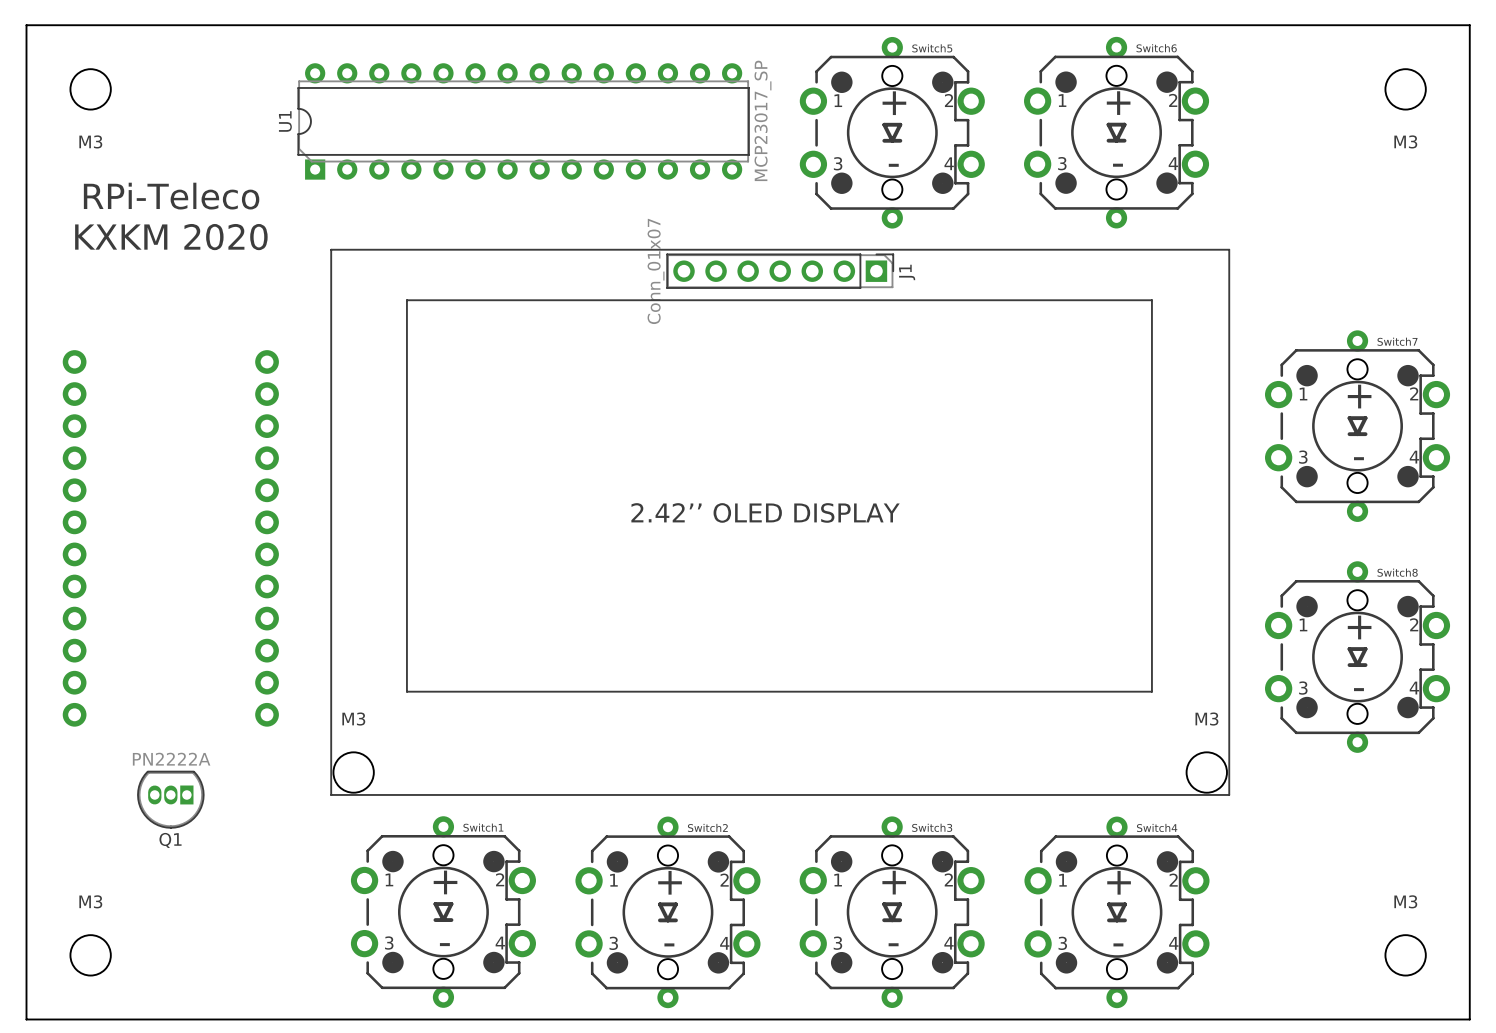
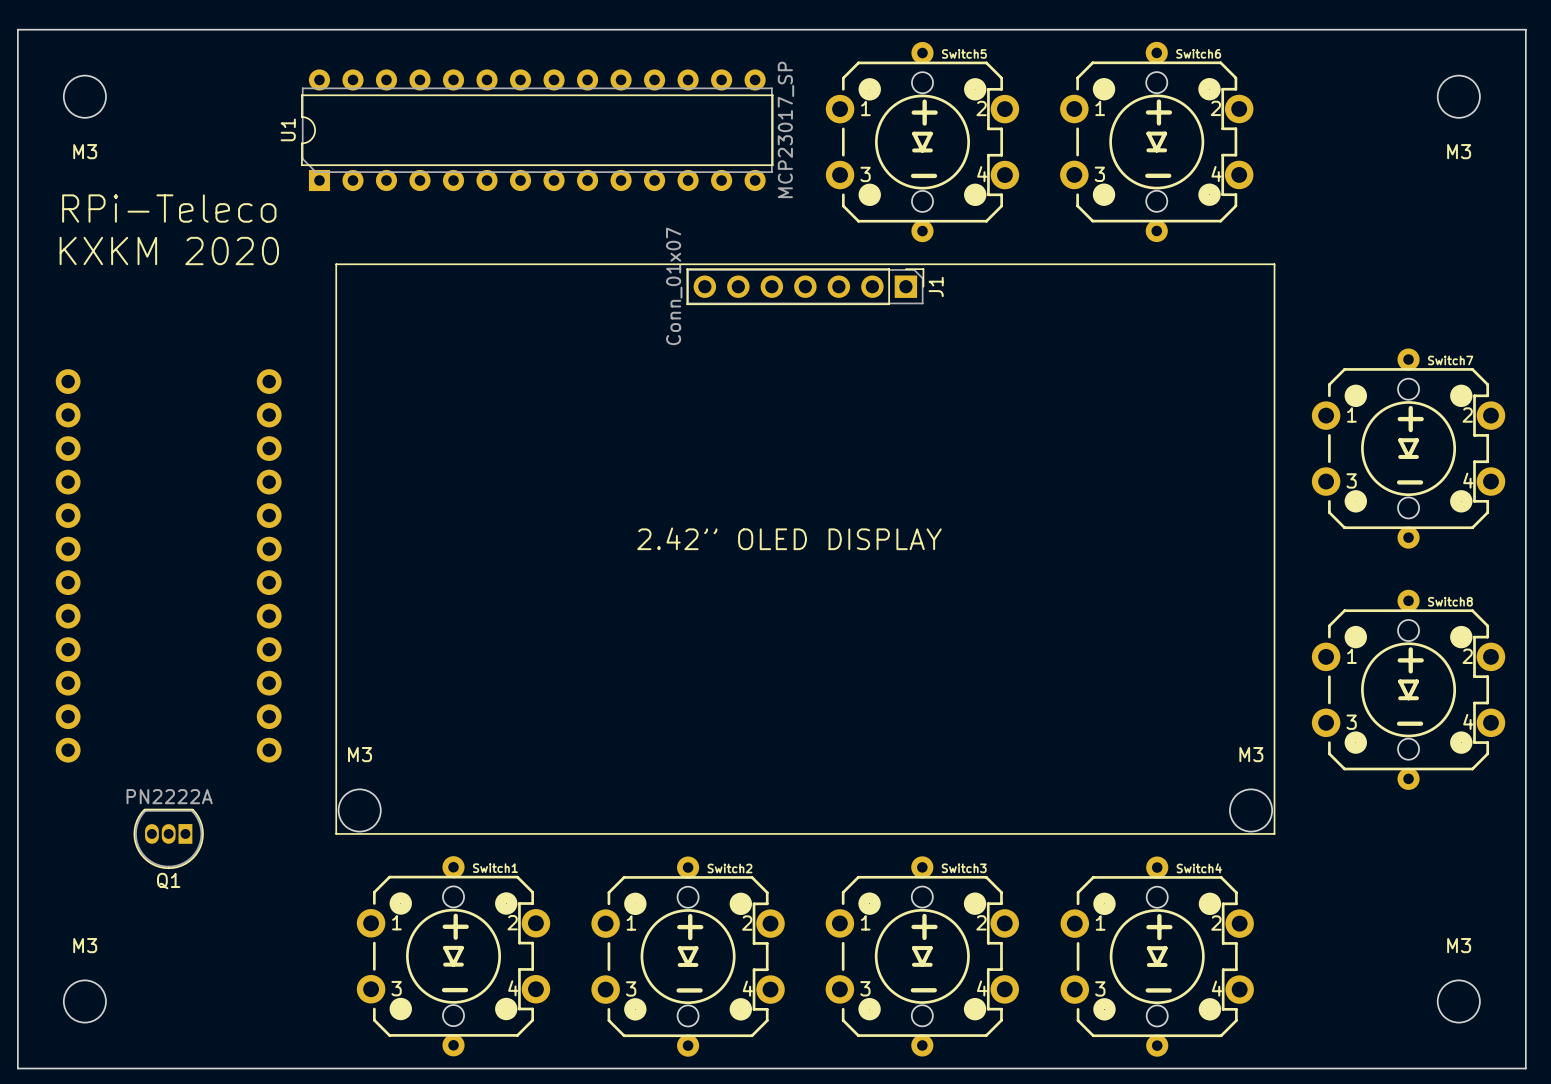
line: (406, 300) (406, 691) (1151, 691) (1151, 300) (406, 300) -> none

